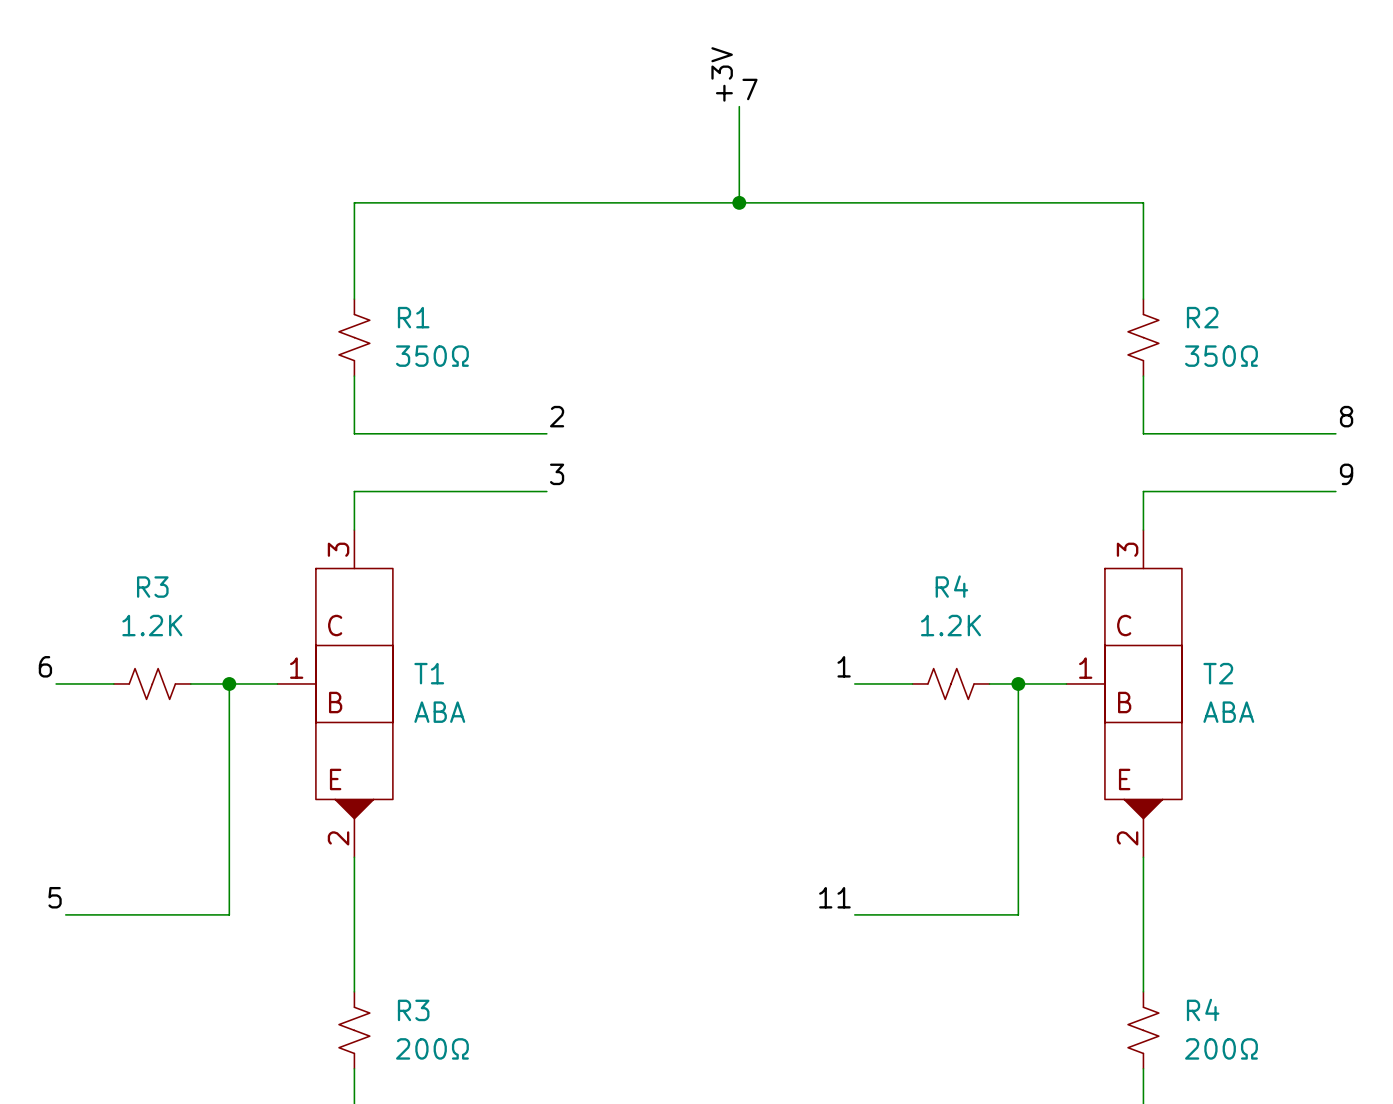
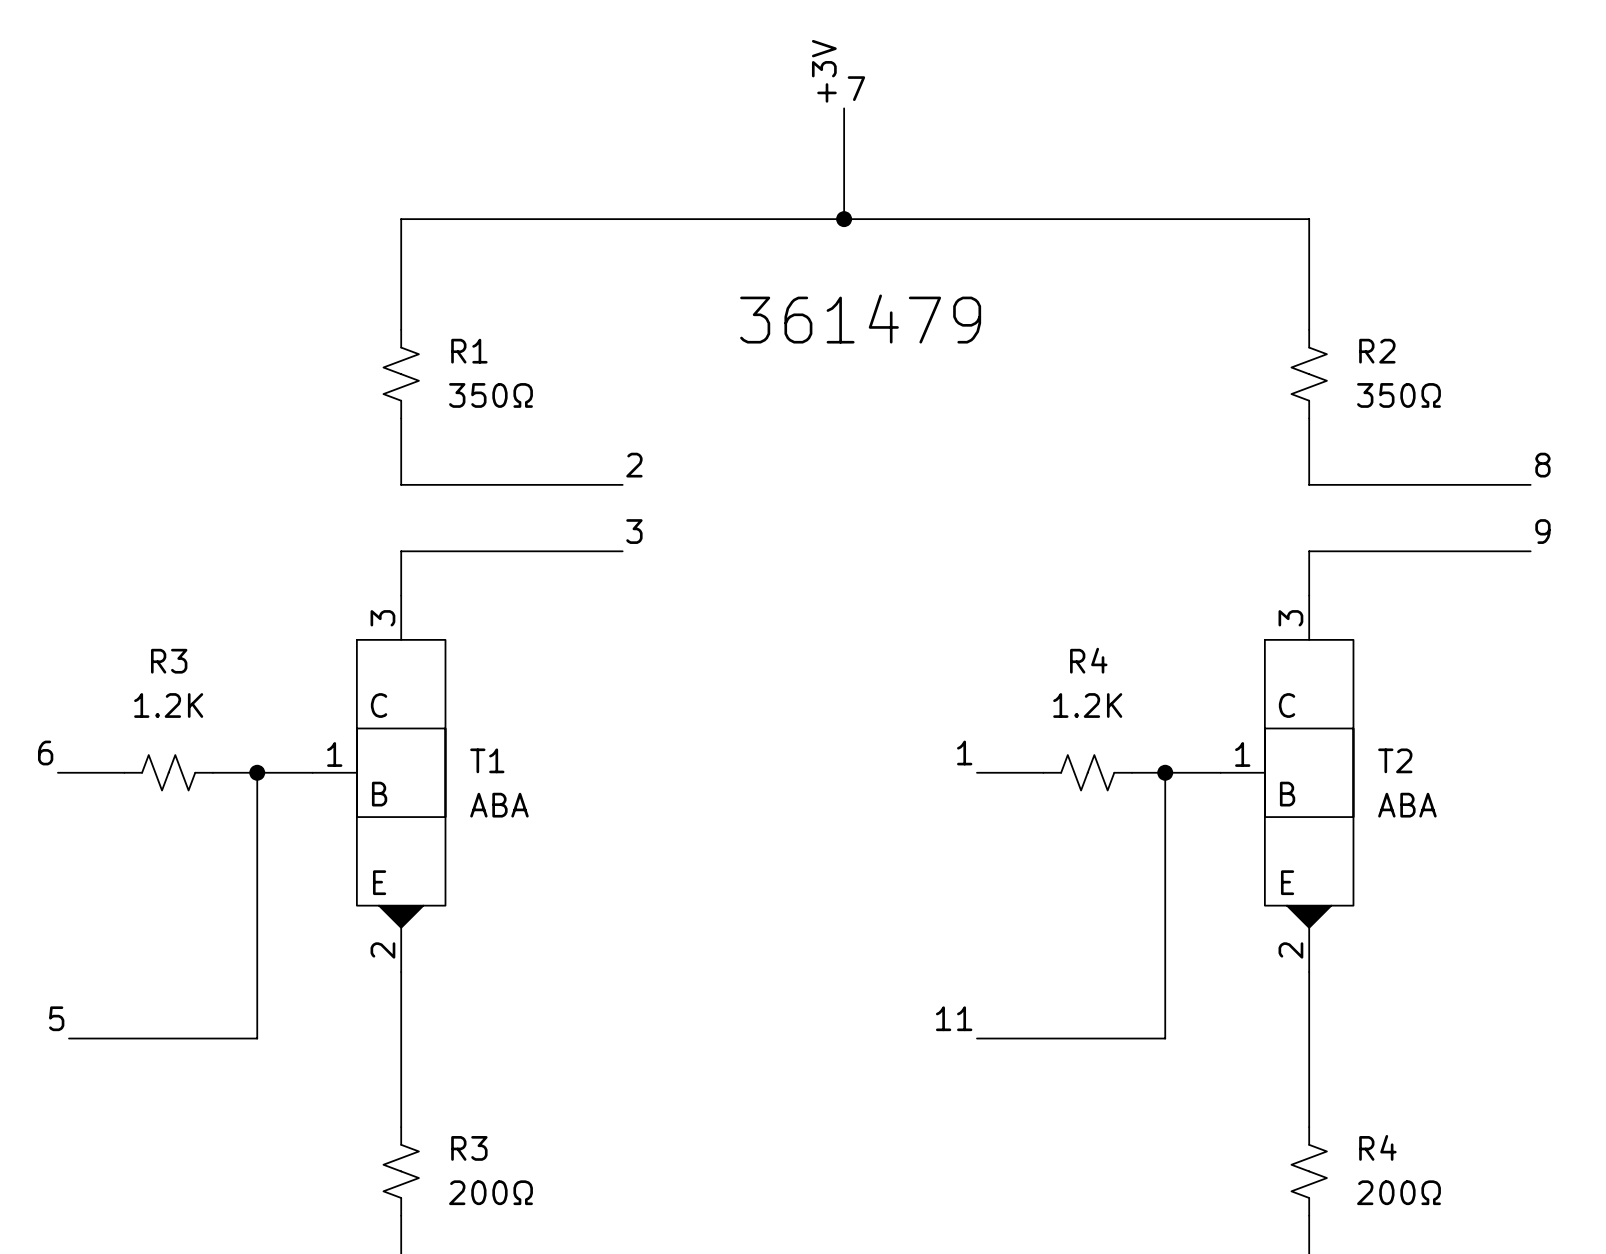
text: none -> 361479 (860, 319)

